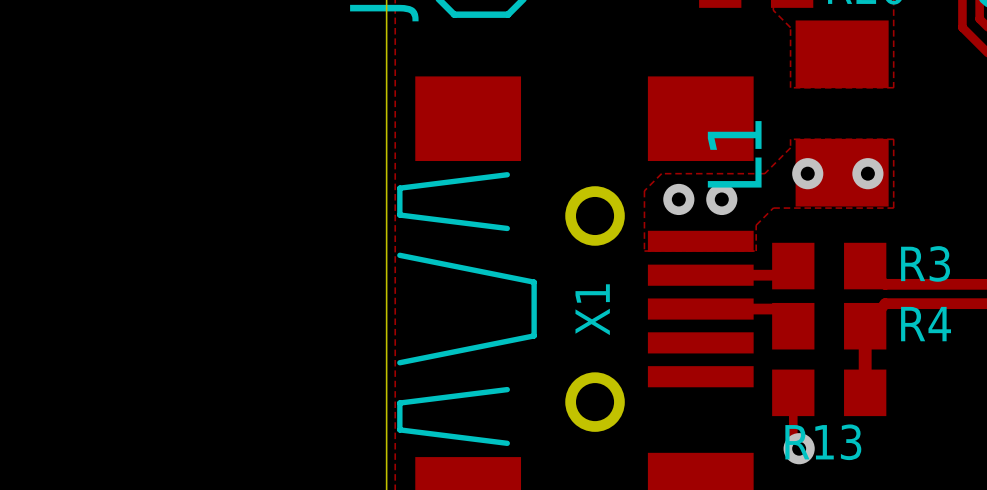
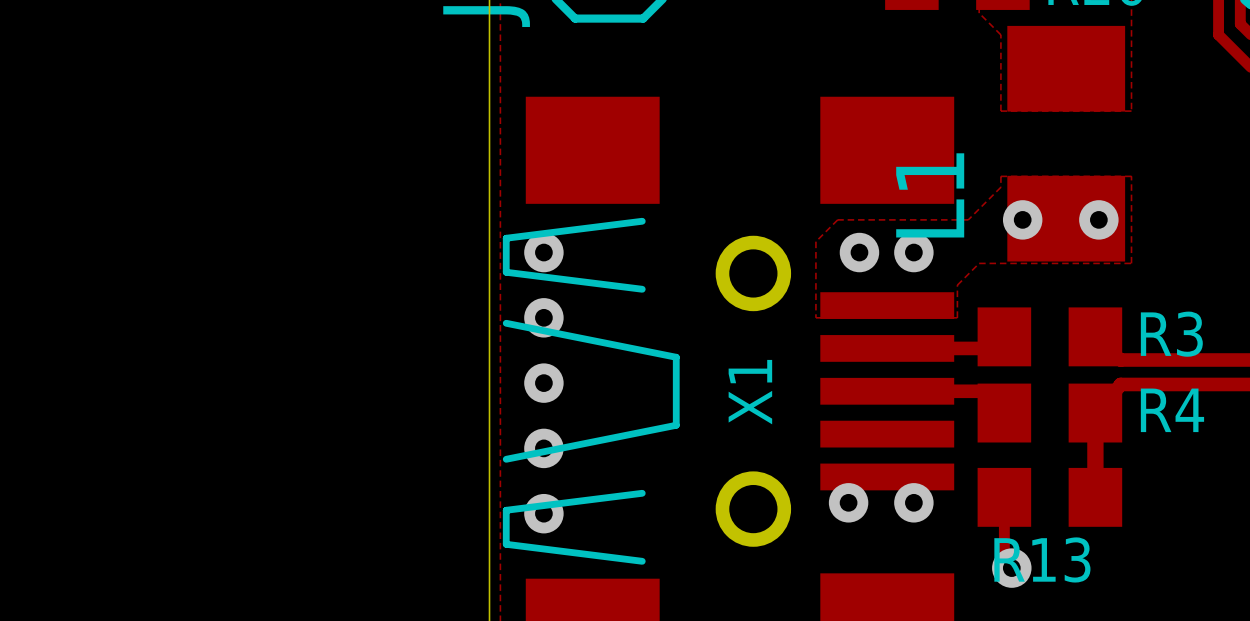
via: none -> (543, 252)
via: none -> (543, 317)
via: none -> (543, 383)
via: none -> (543, 448)
via: none -> (848, 502)
via: none -> (913, 502)
via: none -> (543, 513)

